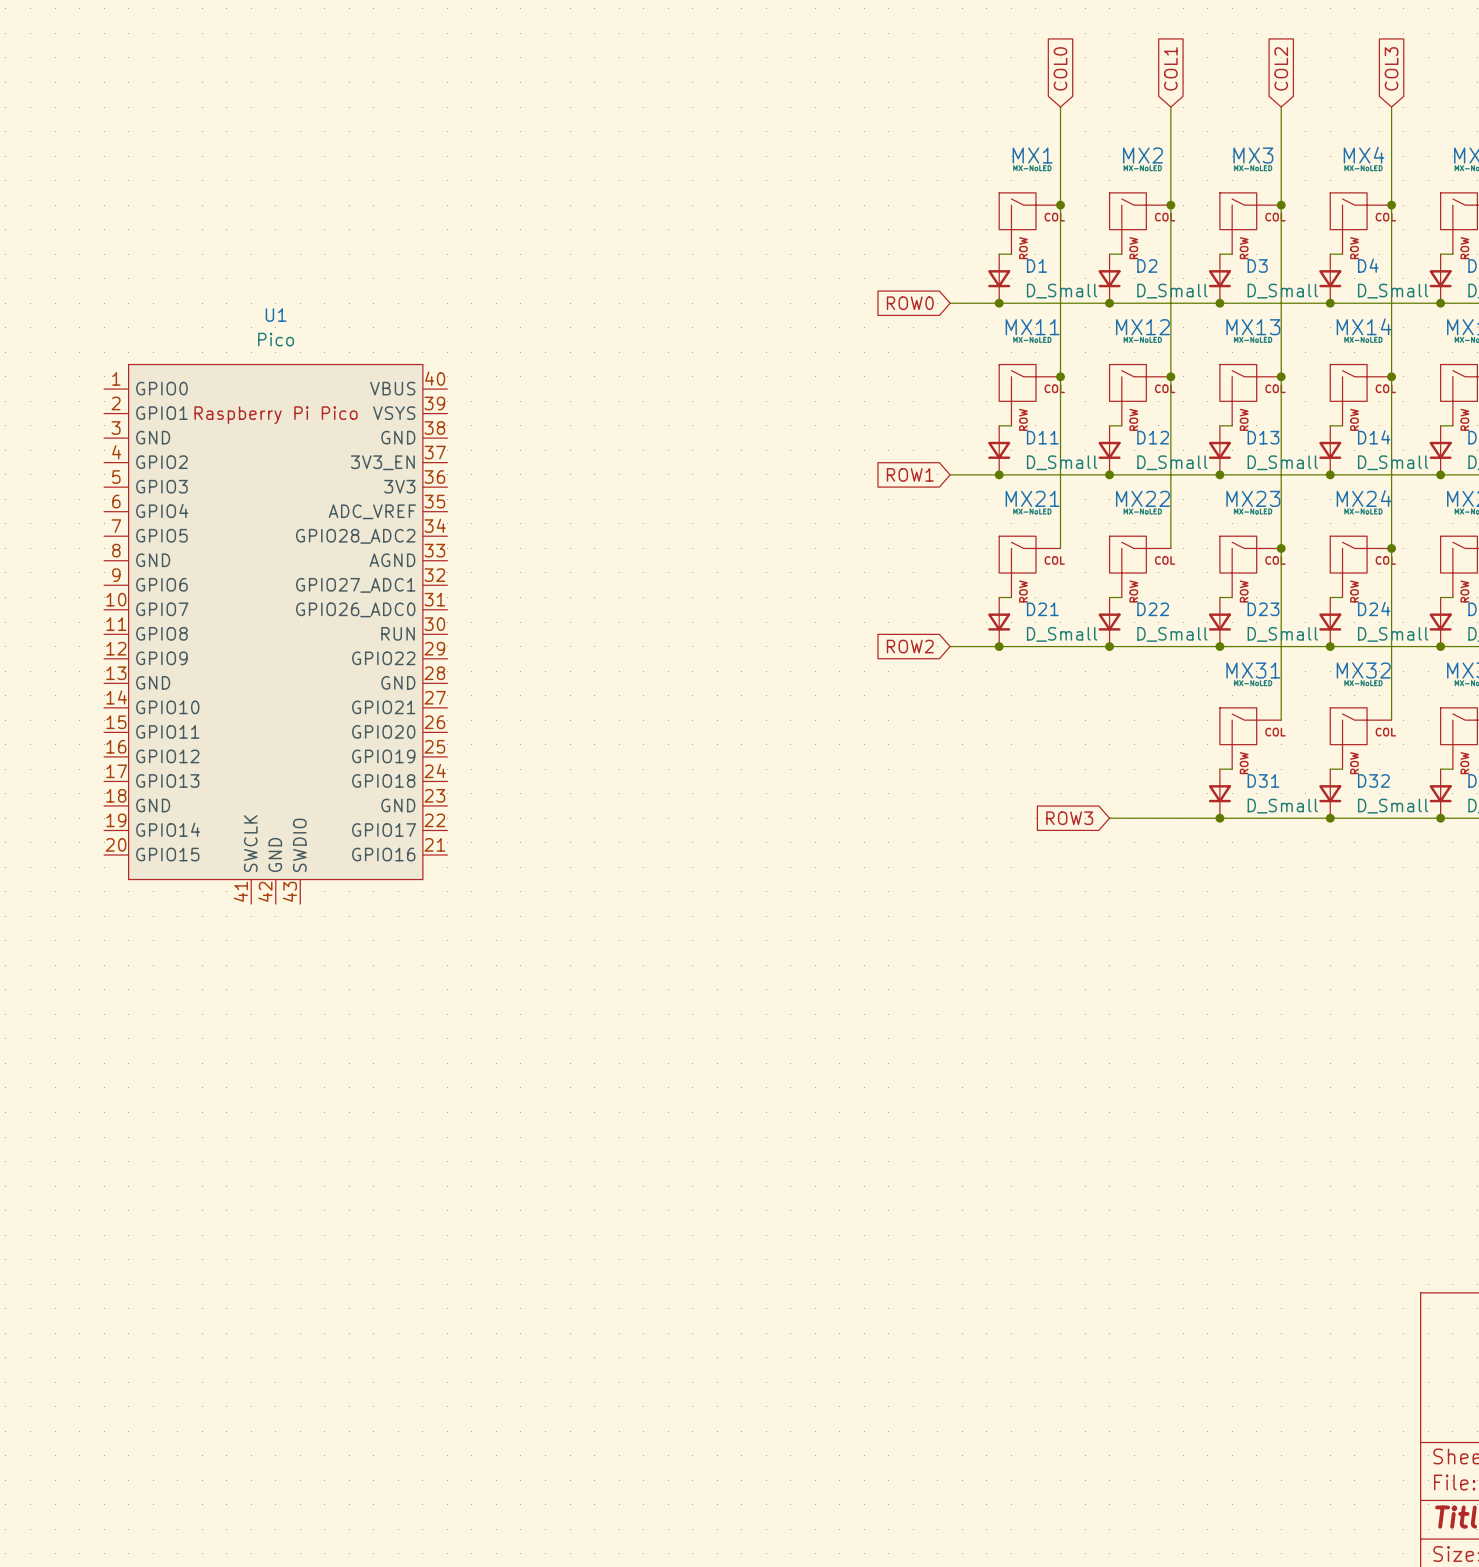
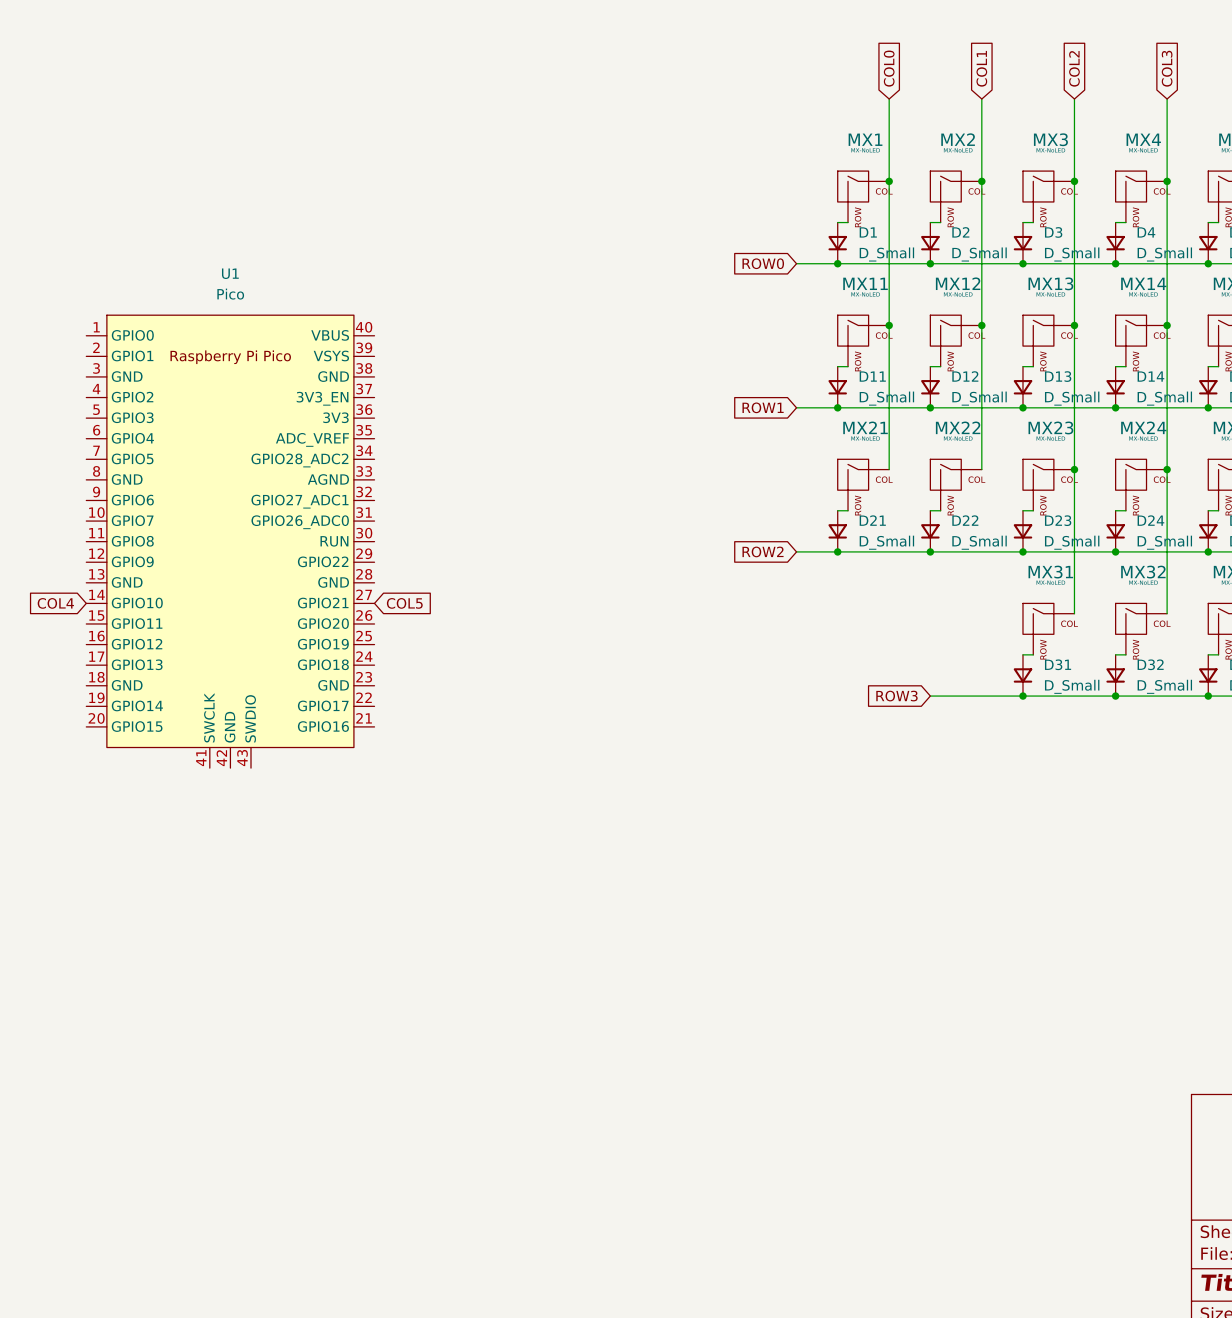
global label: none -> COL4 (55, 603)
global label: none -> COL5 (404, 603)

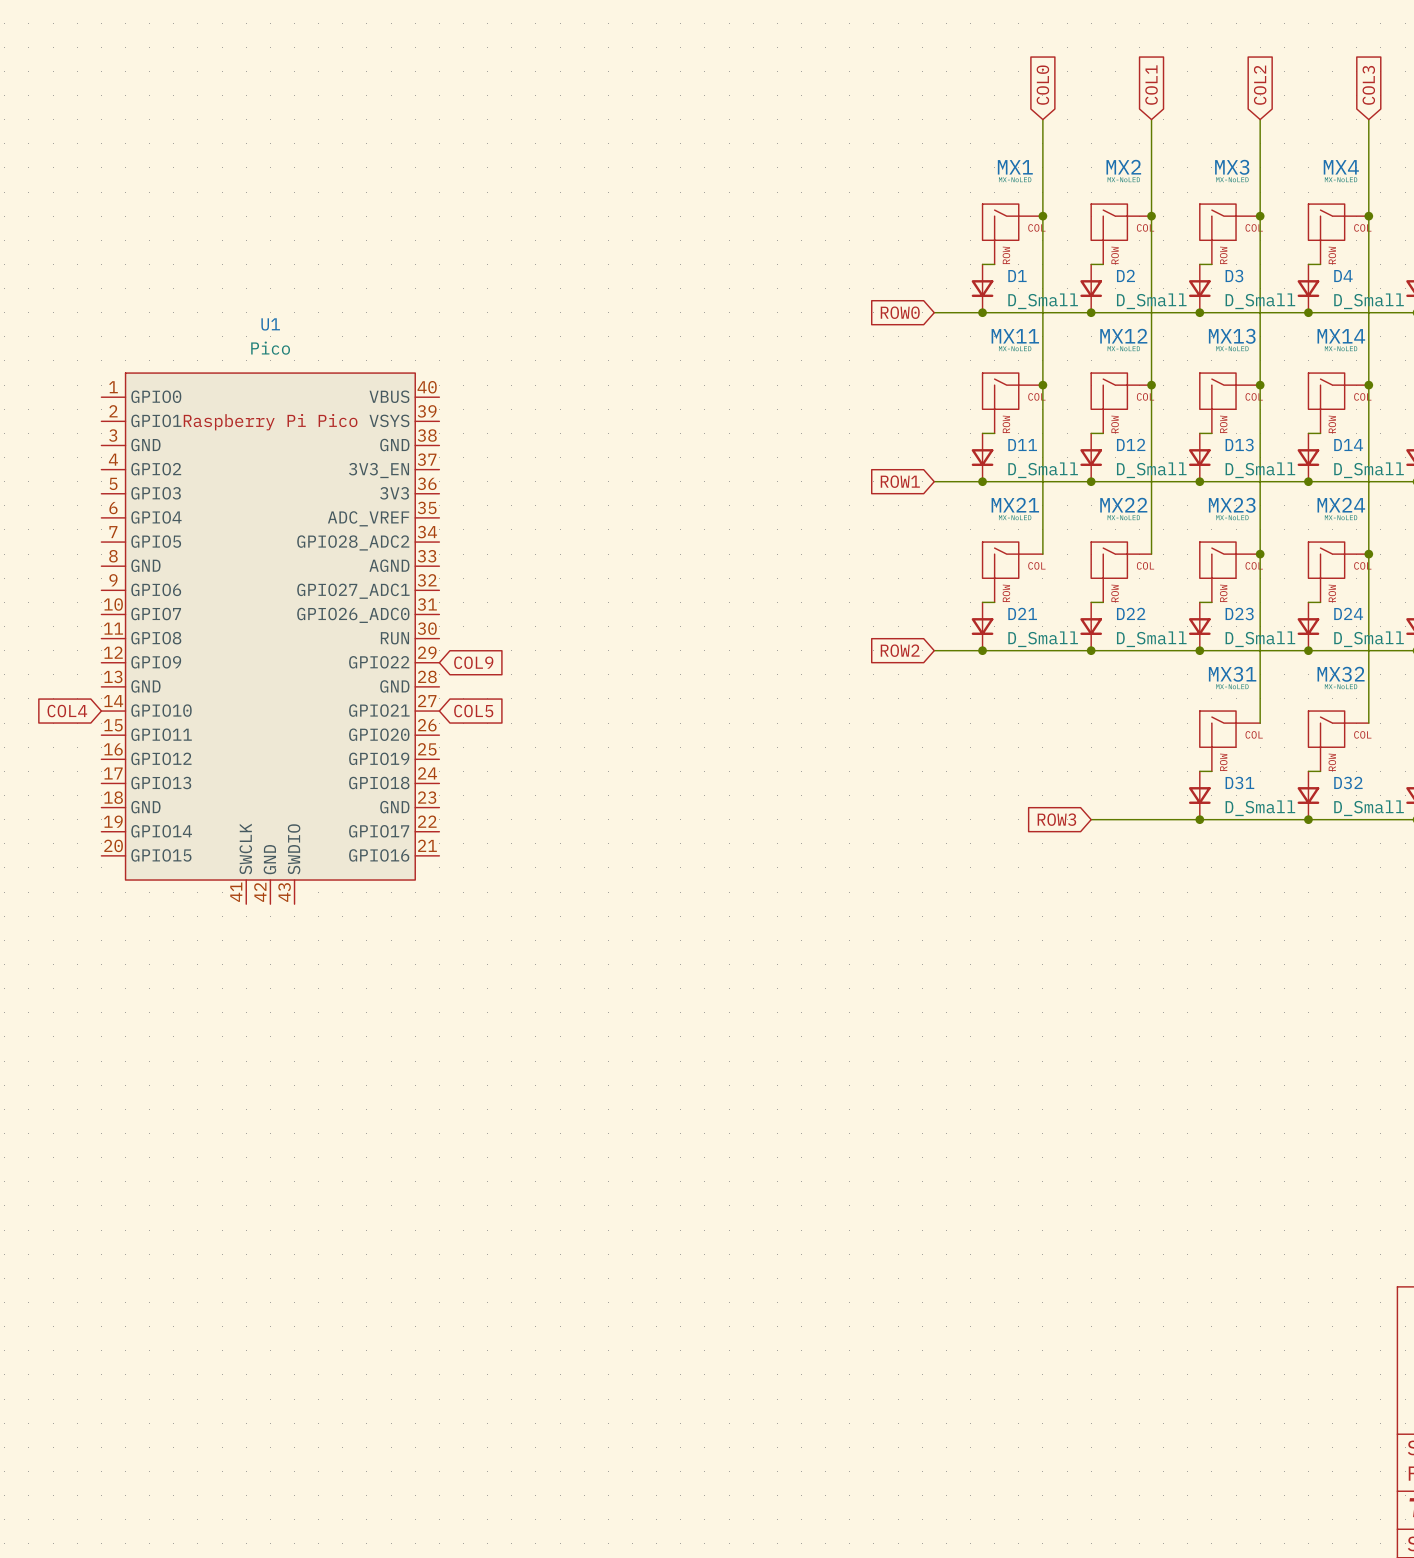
global label: none -> COL9 (473, 662)

